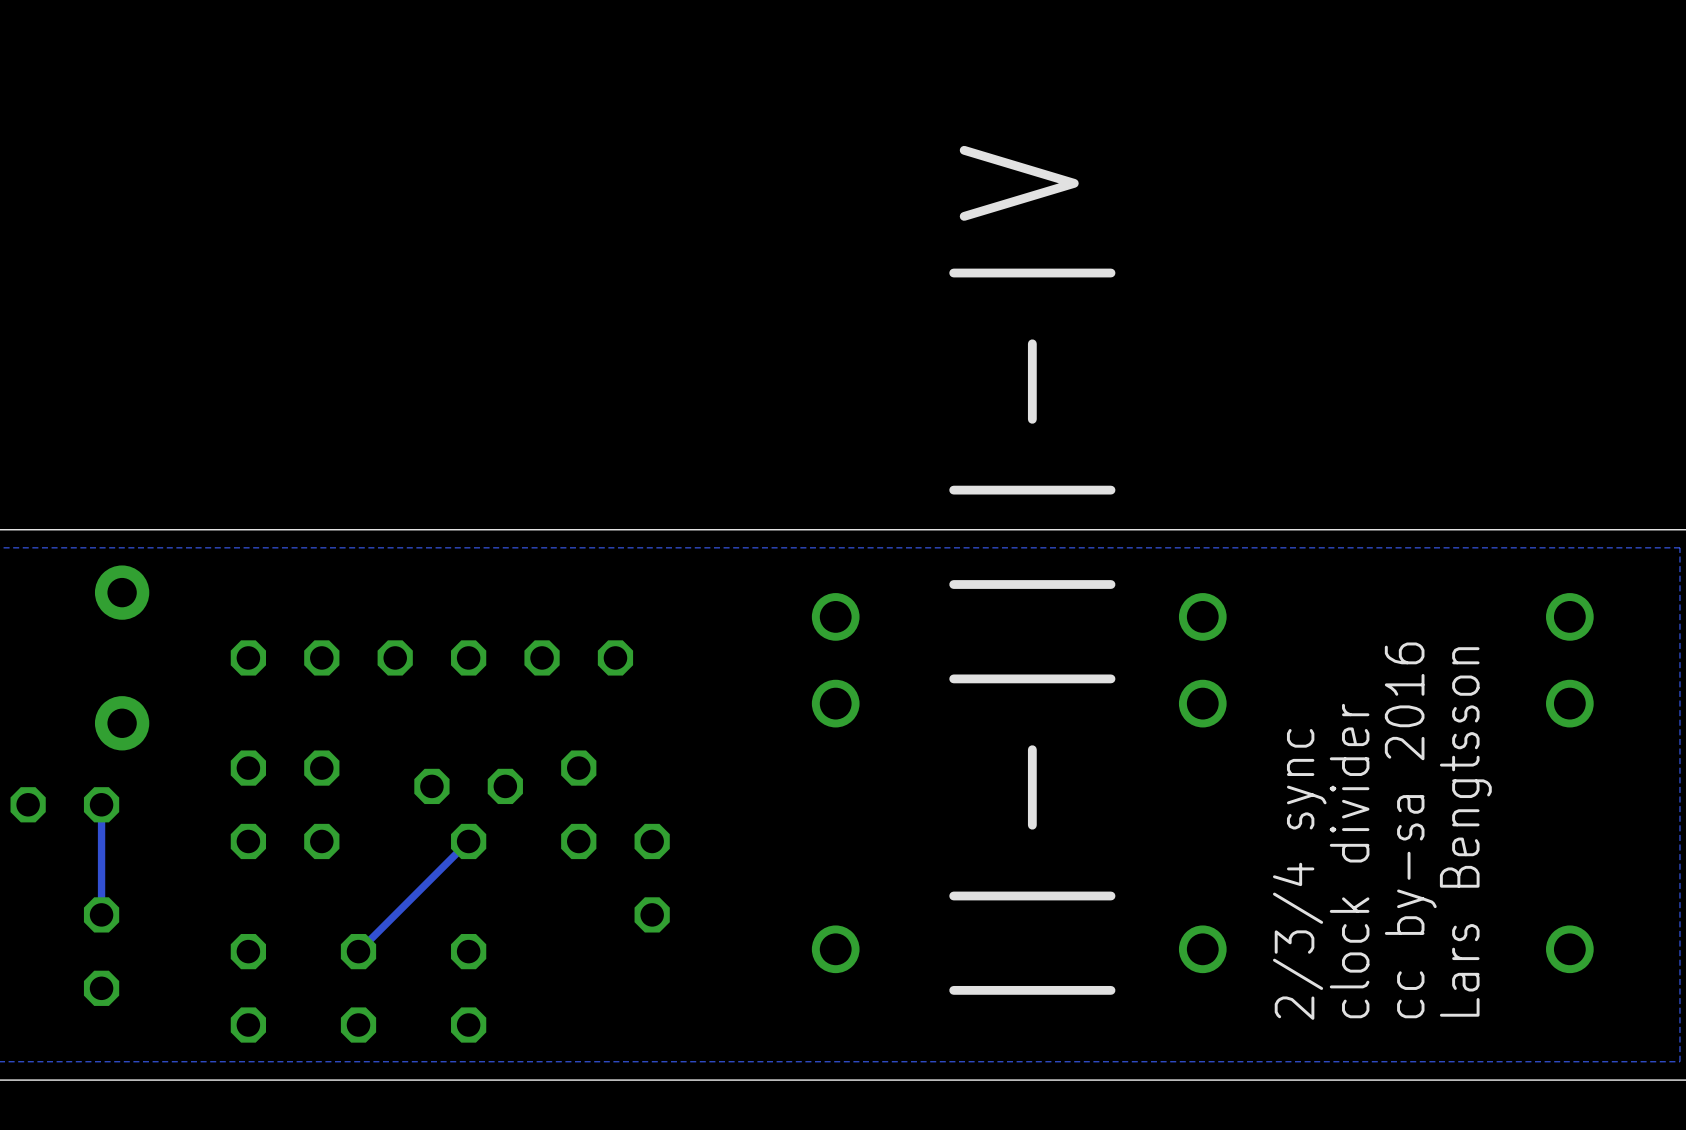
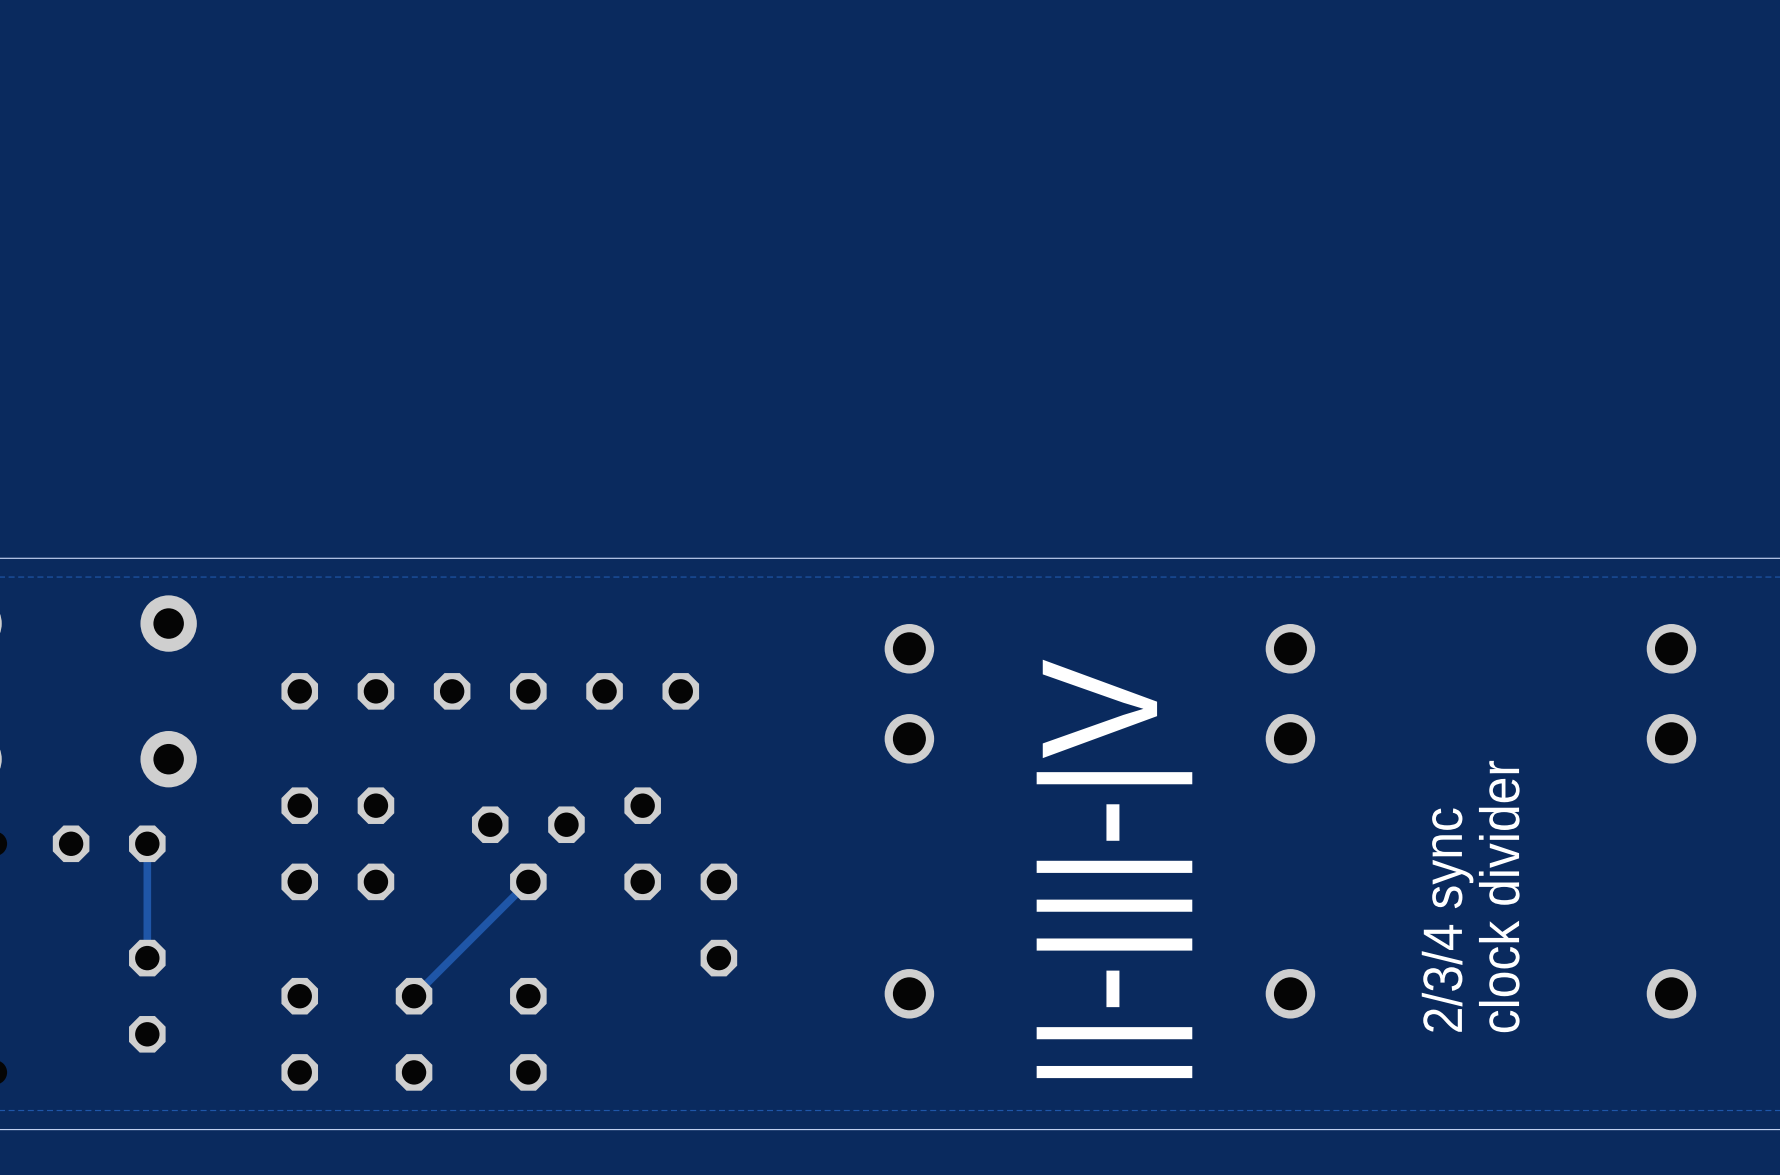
text: cc by-sa 2016 (1410, 830) -> none
text: Lars Bengtsson (1465, 831) -> none
text position: clock divider (1349, 861) -> clock divider (1499, 896)
text position: 2/3/4 sync (1299, 874) -> 2/3/4 sync (1447, 920)

